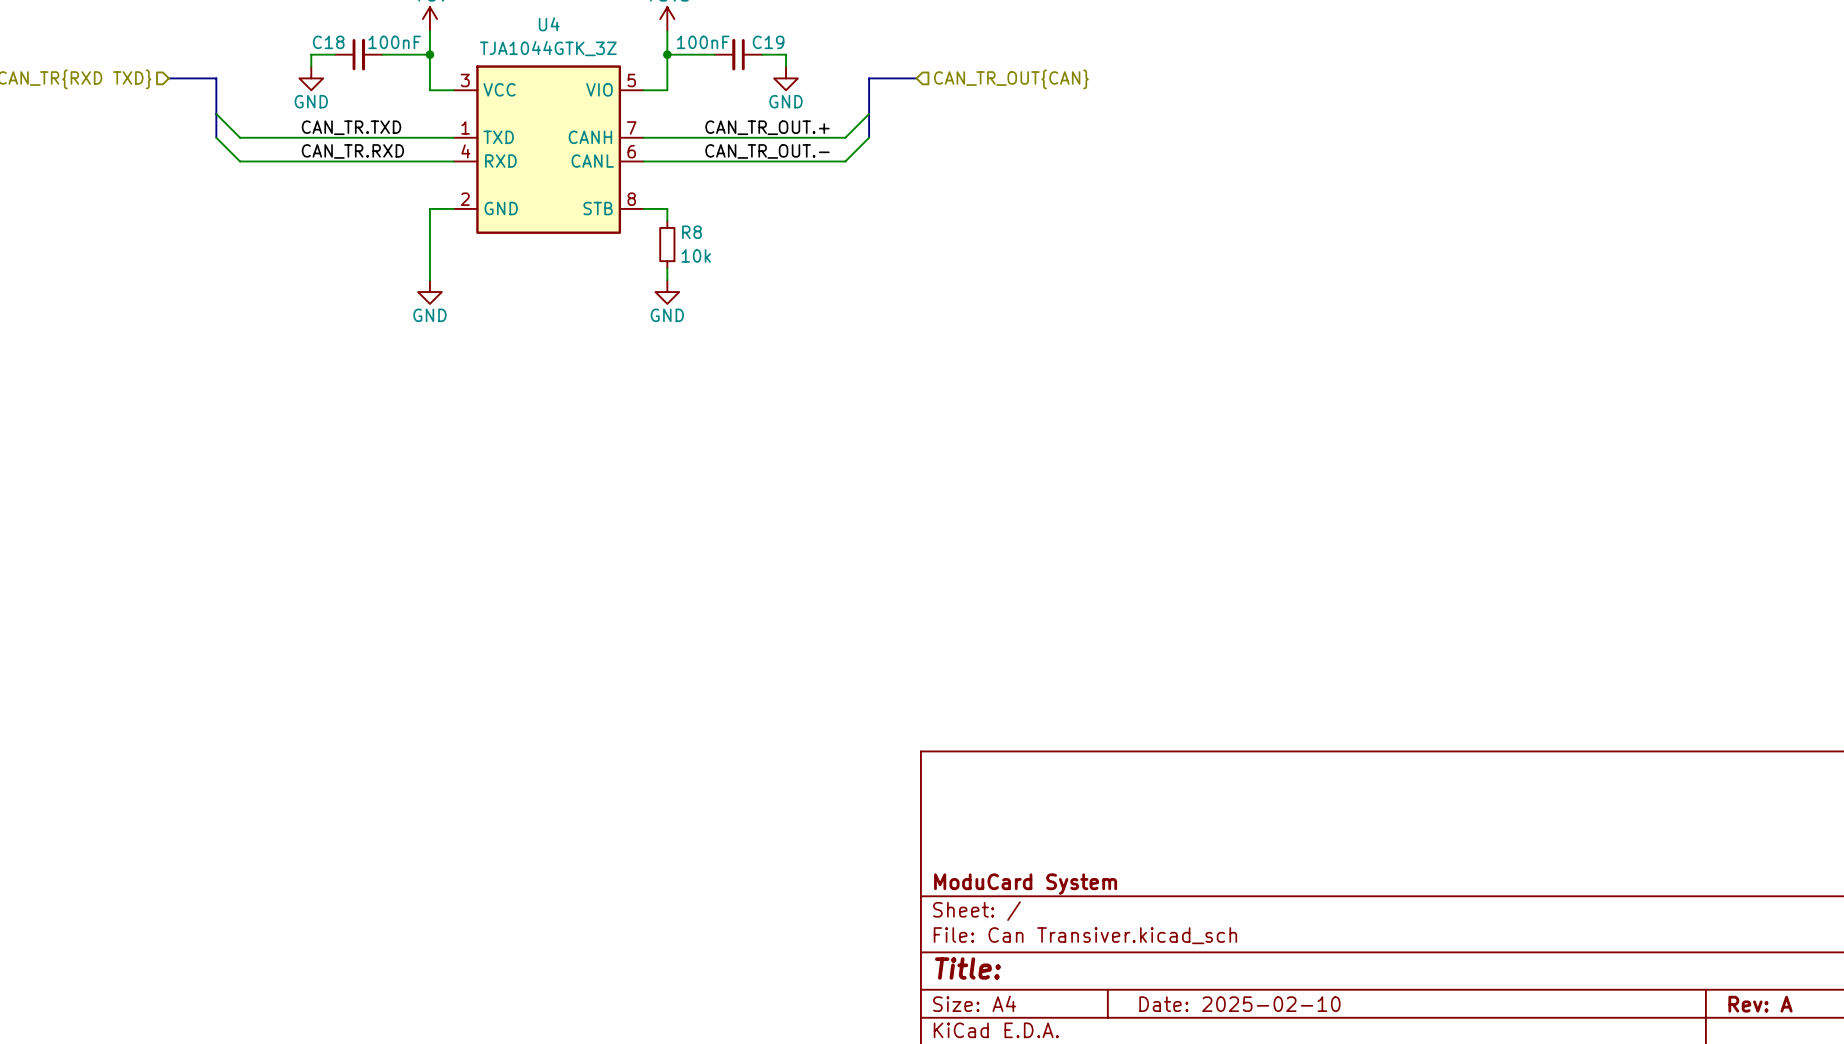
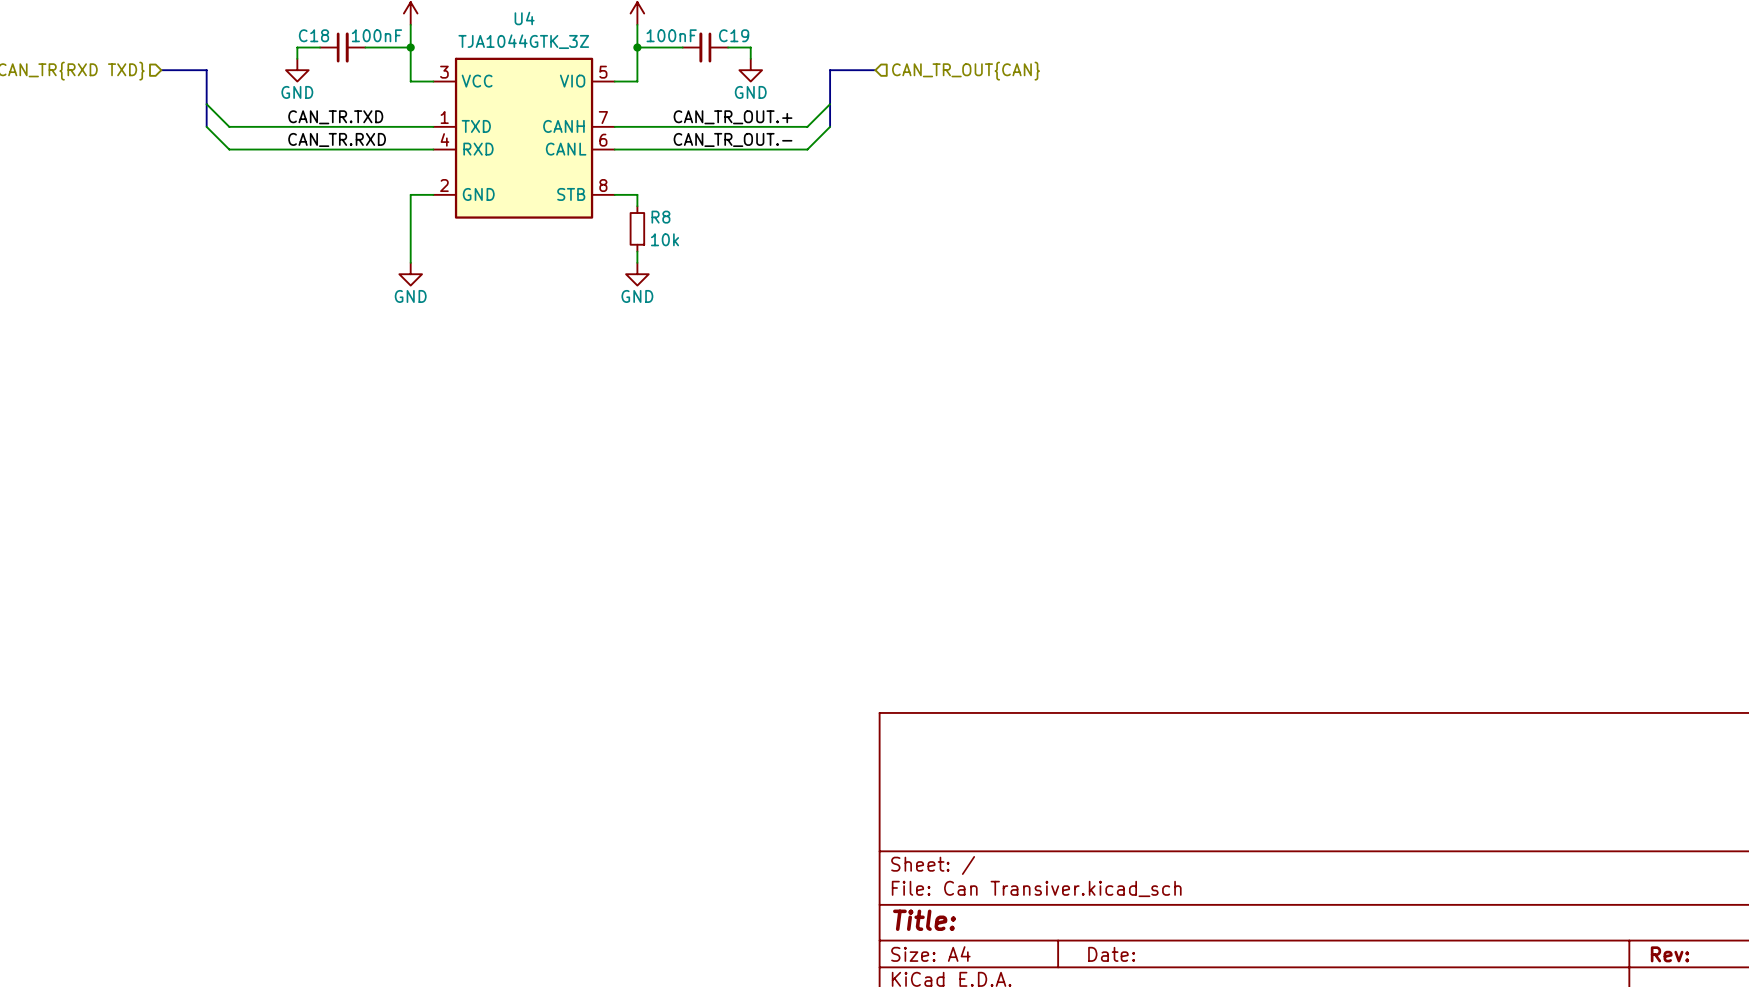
title block: ModuCard System (1025, 884) -> none
title block: Date: 2025-02-10 (1239, 1004) -> Date: (1111, 954)
title block: Rev: A (1760, 1004) -> Rev: (1669, 954)

